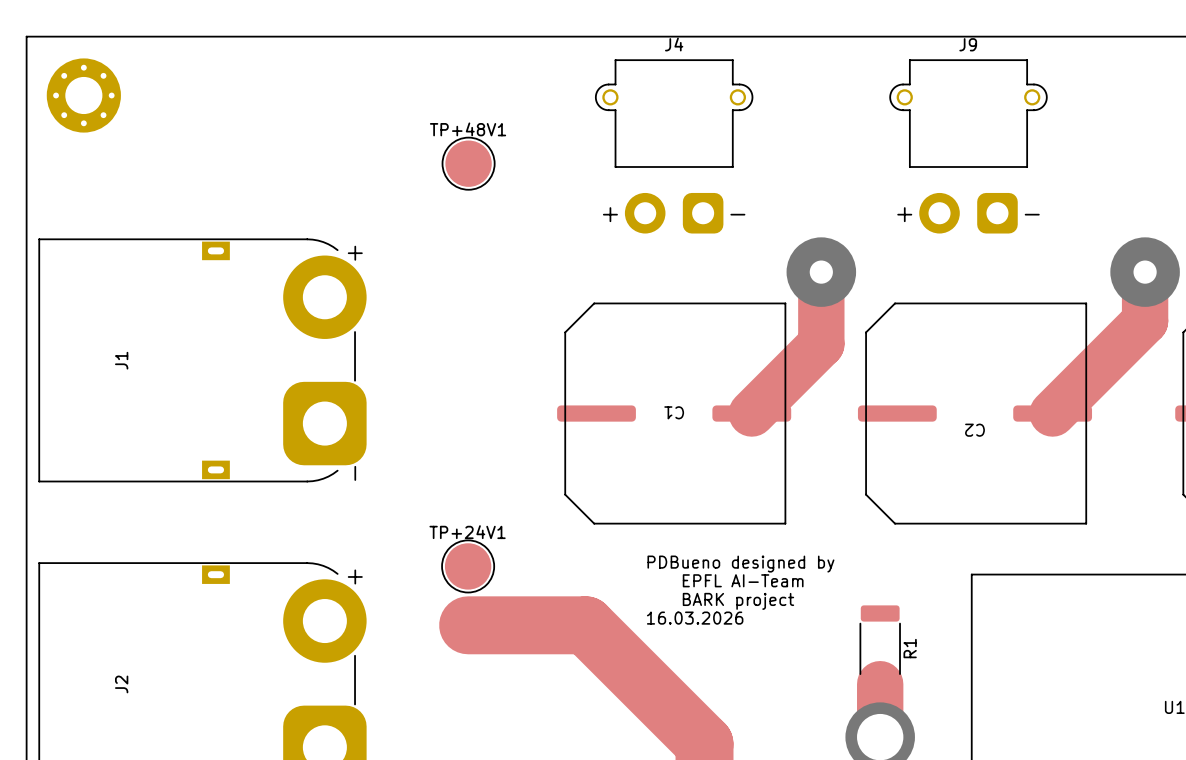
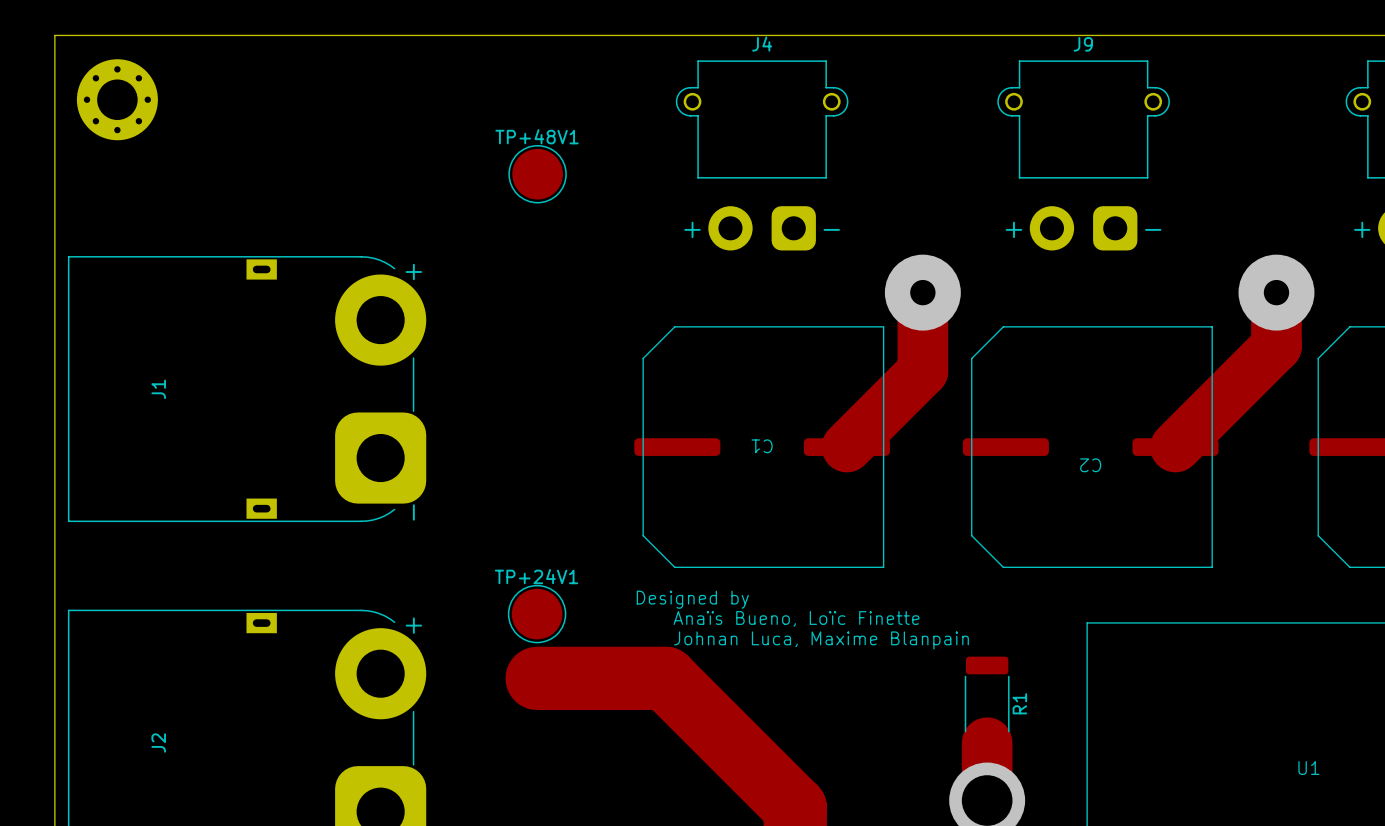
text: PDBueno designed by (740, 564) -> Designed by (692, 599)
text: none -> Anaïs Bueno, Loïc Finette (796, 618)
text: EPFL AI-Team (743, 580) -> none
text: none -> Johnan Luca, Maxime Blanpain (821, 640)
text: BARK project (738, 601) -> none
text: 16.03.2026 (695, 618) -> none

